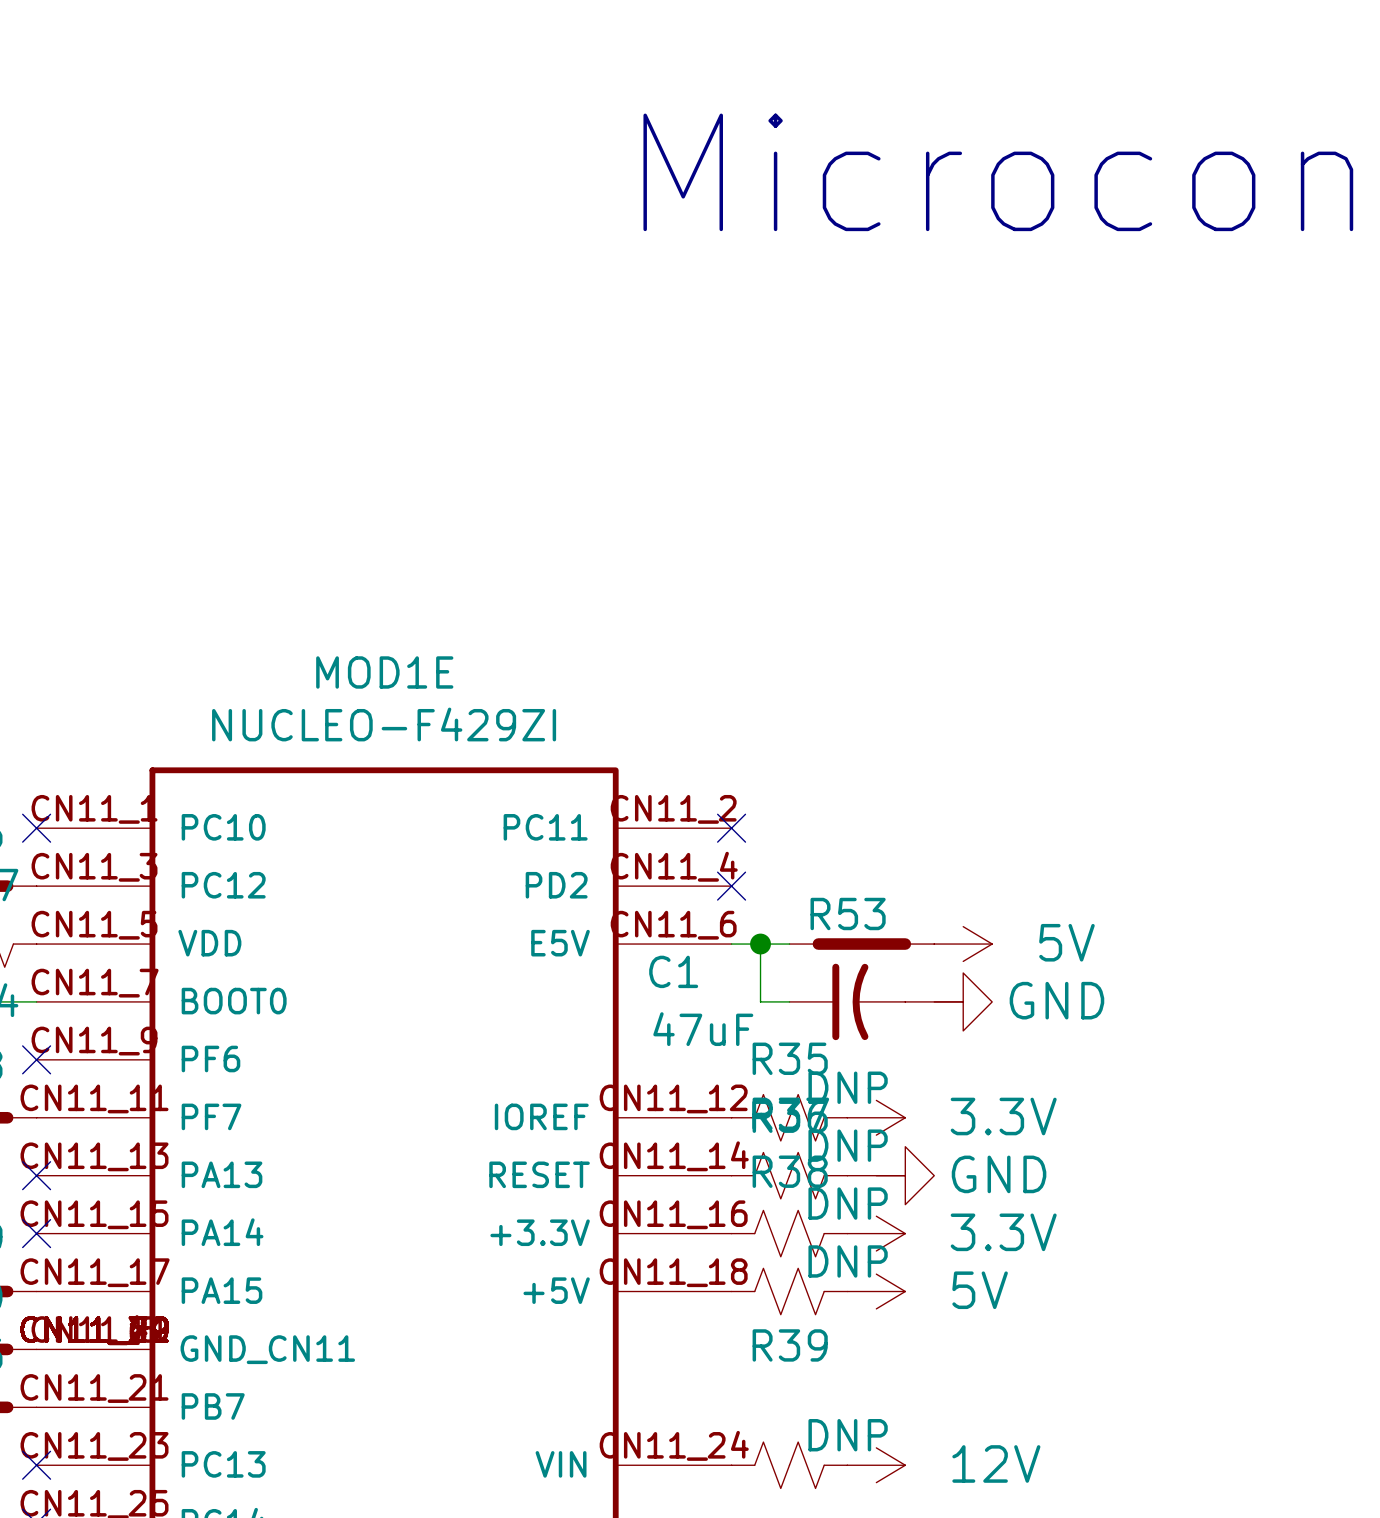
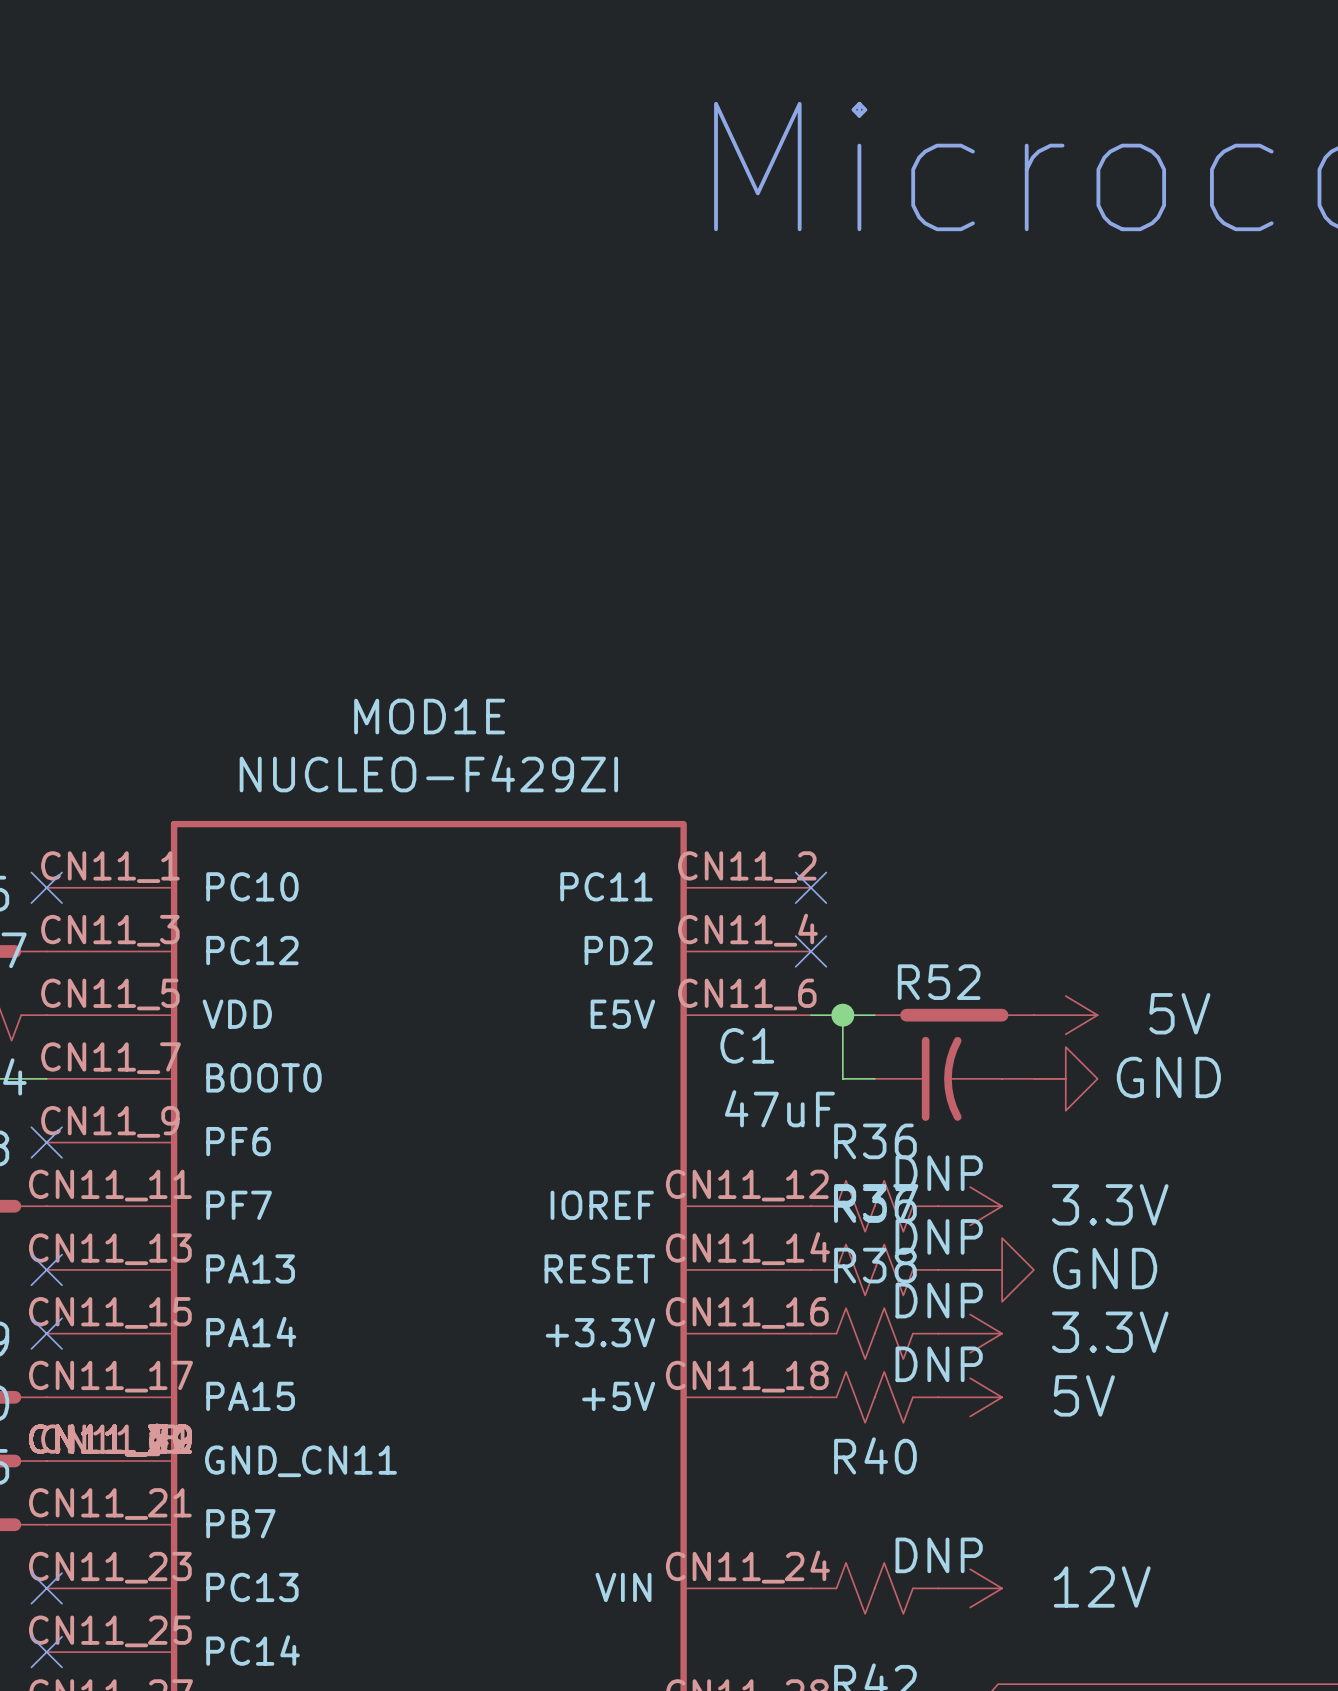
R53 name: R53 (848, 913) -> R52 (939, 982)
R35 name: R35 (790, 1058) -> R36 (875, 1141)
R39 name: R39 (790, 1345) -> R40 (875, 1455)

